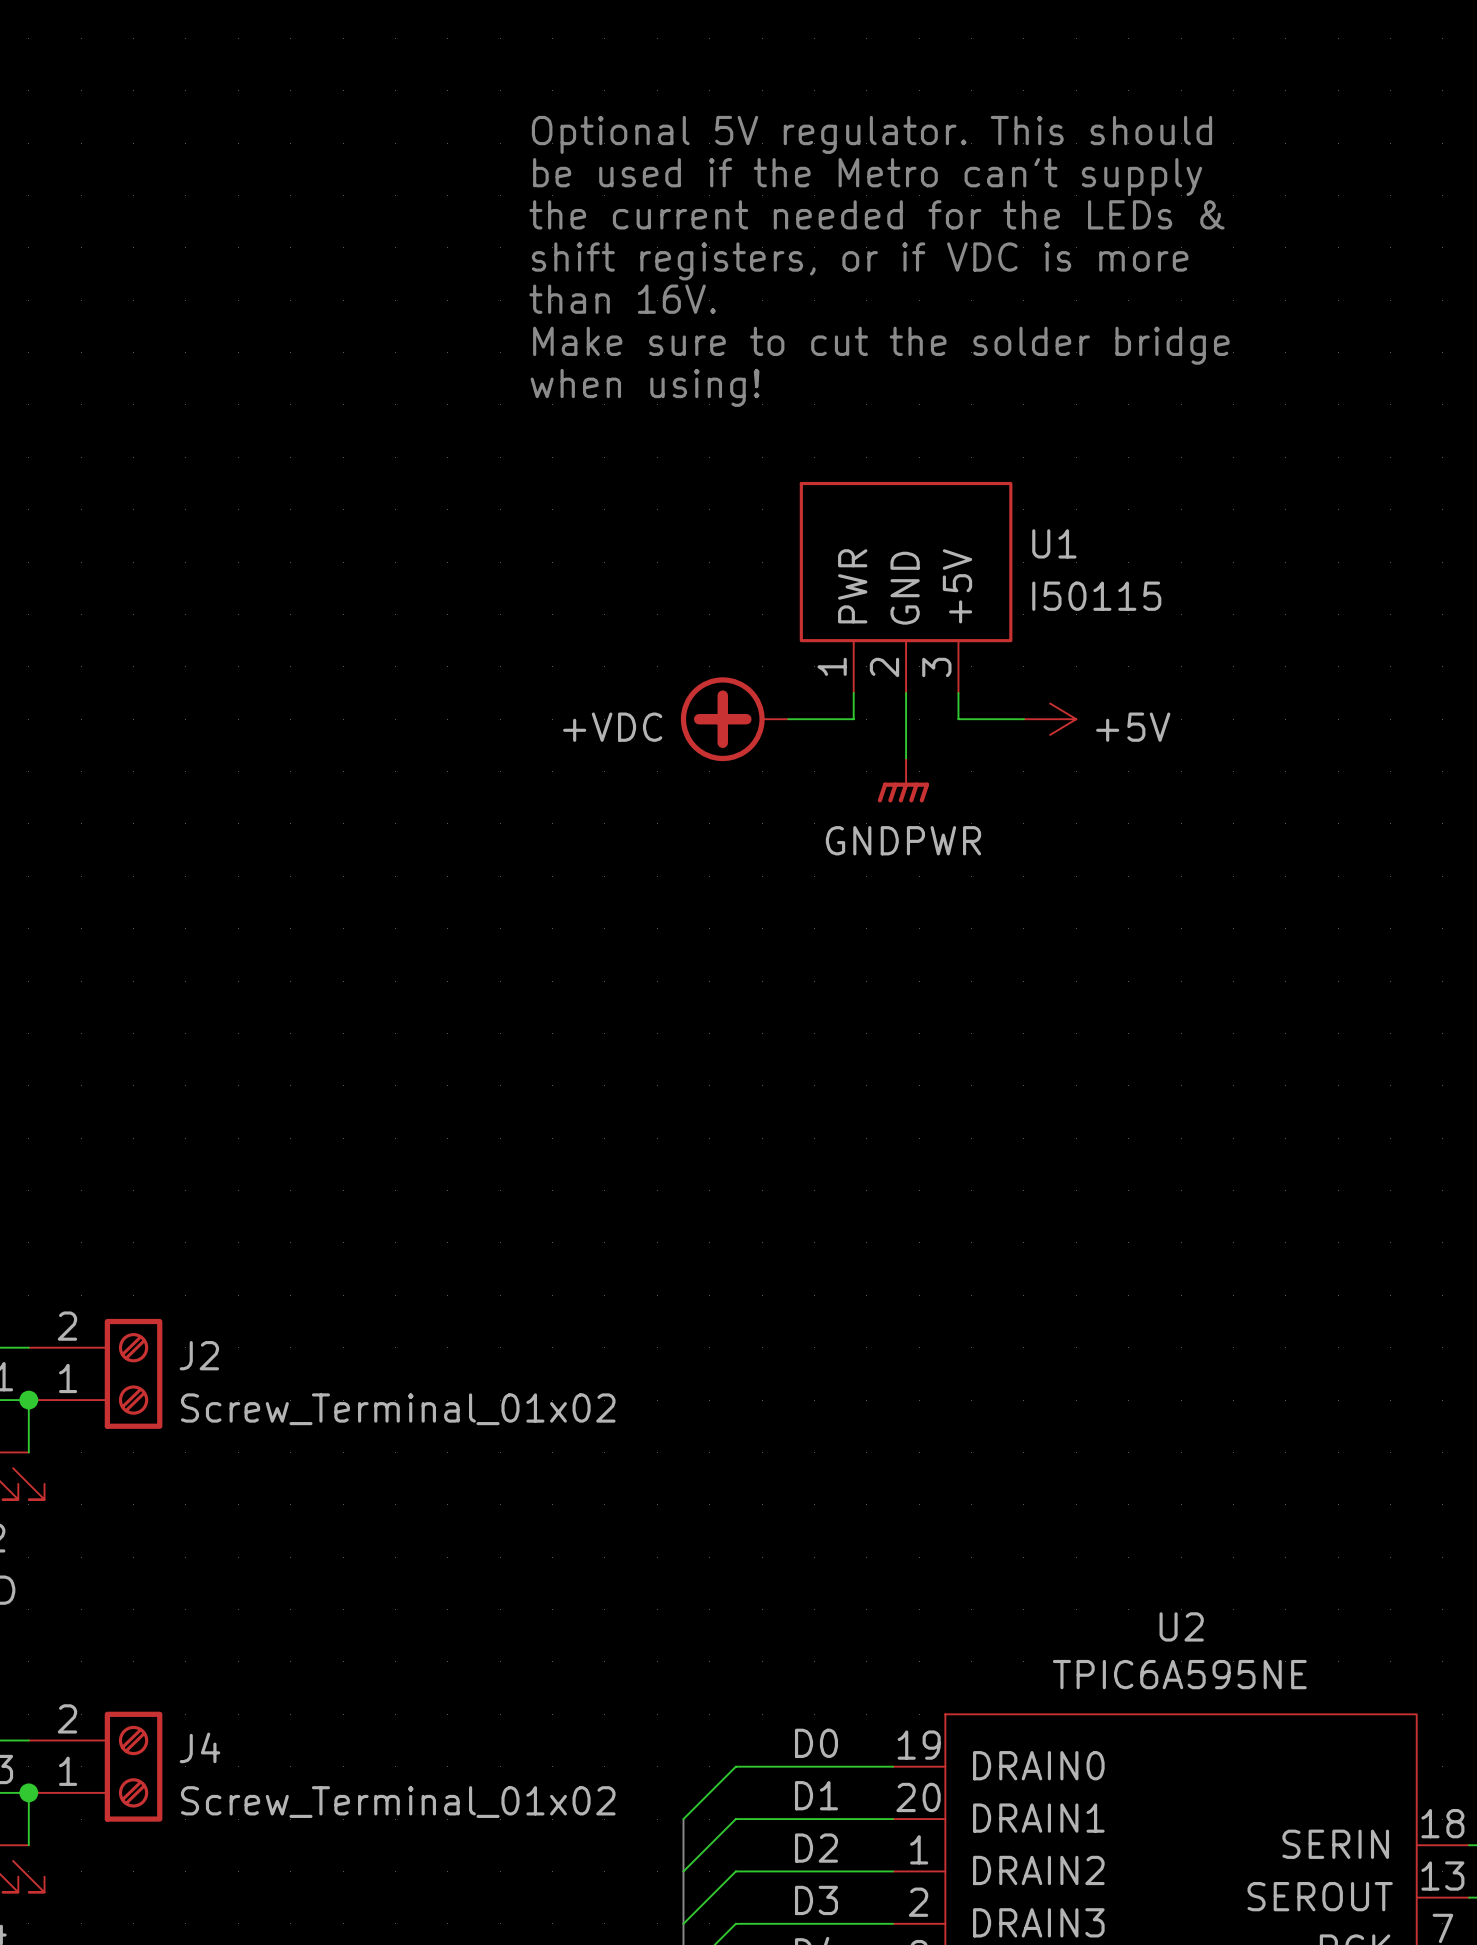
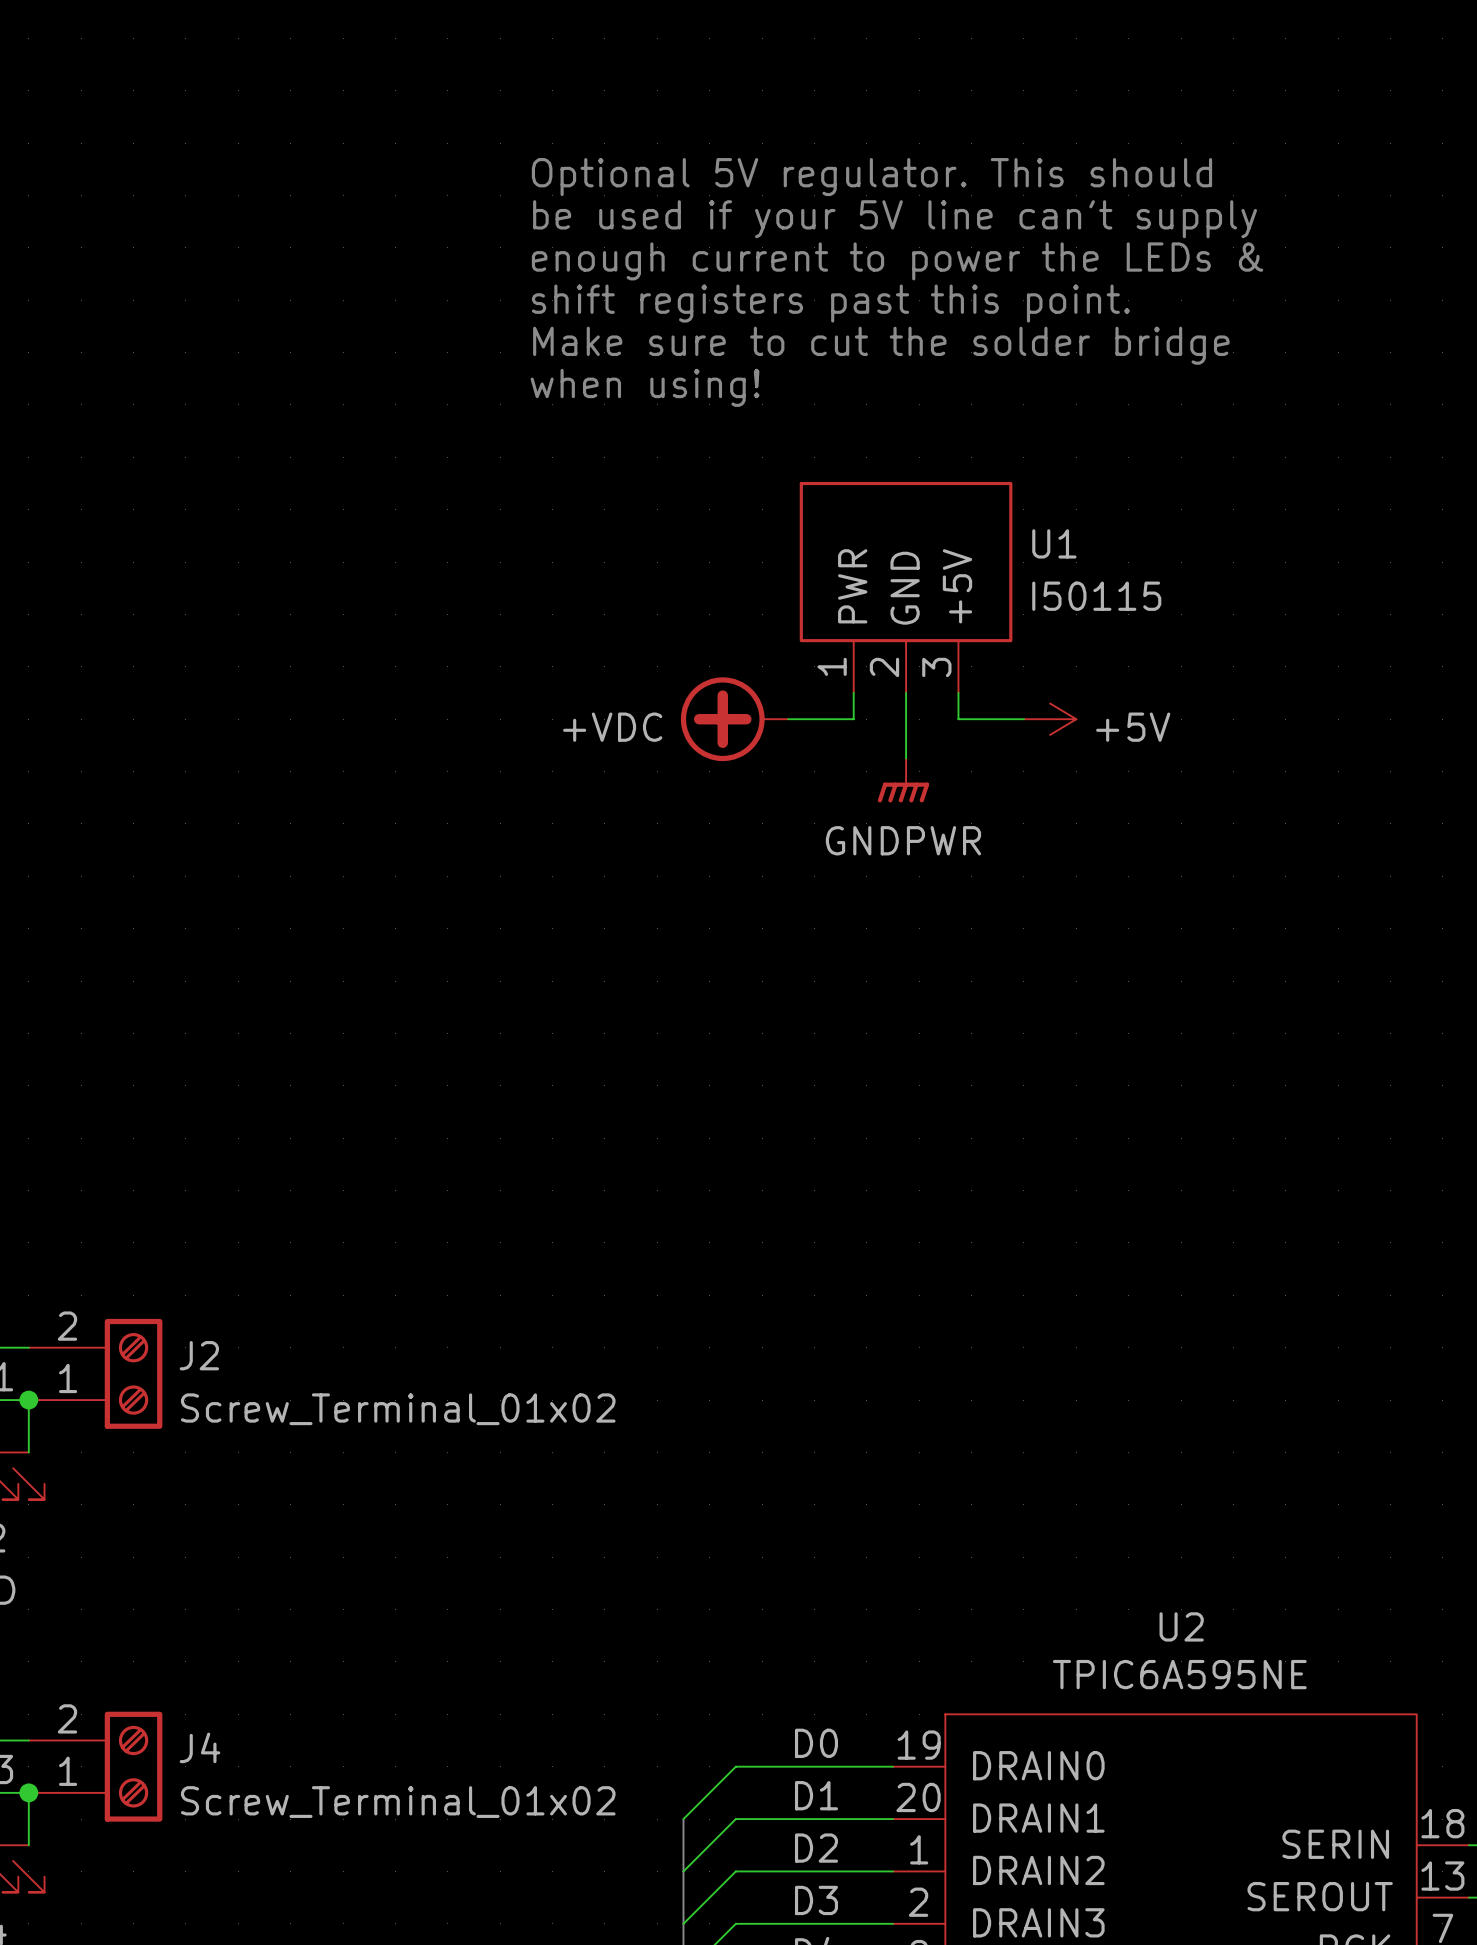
text: Optional 5V regulator. This should (871, 134) -> none
text: be used if the Metro can't supply (867, 177) -> Optional 5V regulator. This should (871, 177)
text: the current needed for the LEDs & (876, 214) -> be used if your 5V line can't supply (895, 219)
text: shift registers, or if VDC is more (860, 261) -> enough current to power the LEDs & (897, 261)
text: than 16V. (622, 299) -> shift registers past this point. (830, 303)

